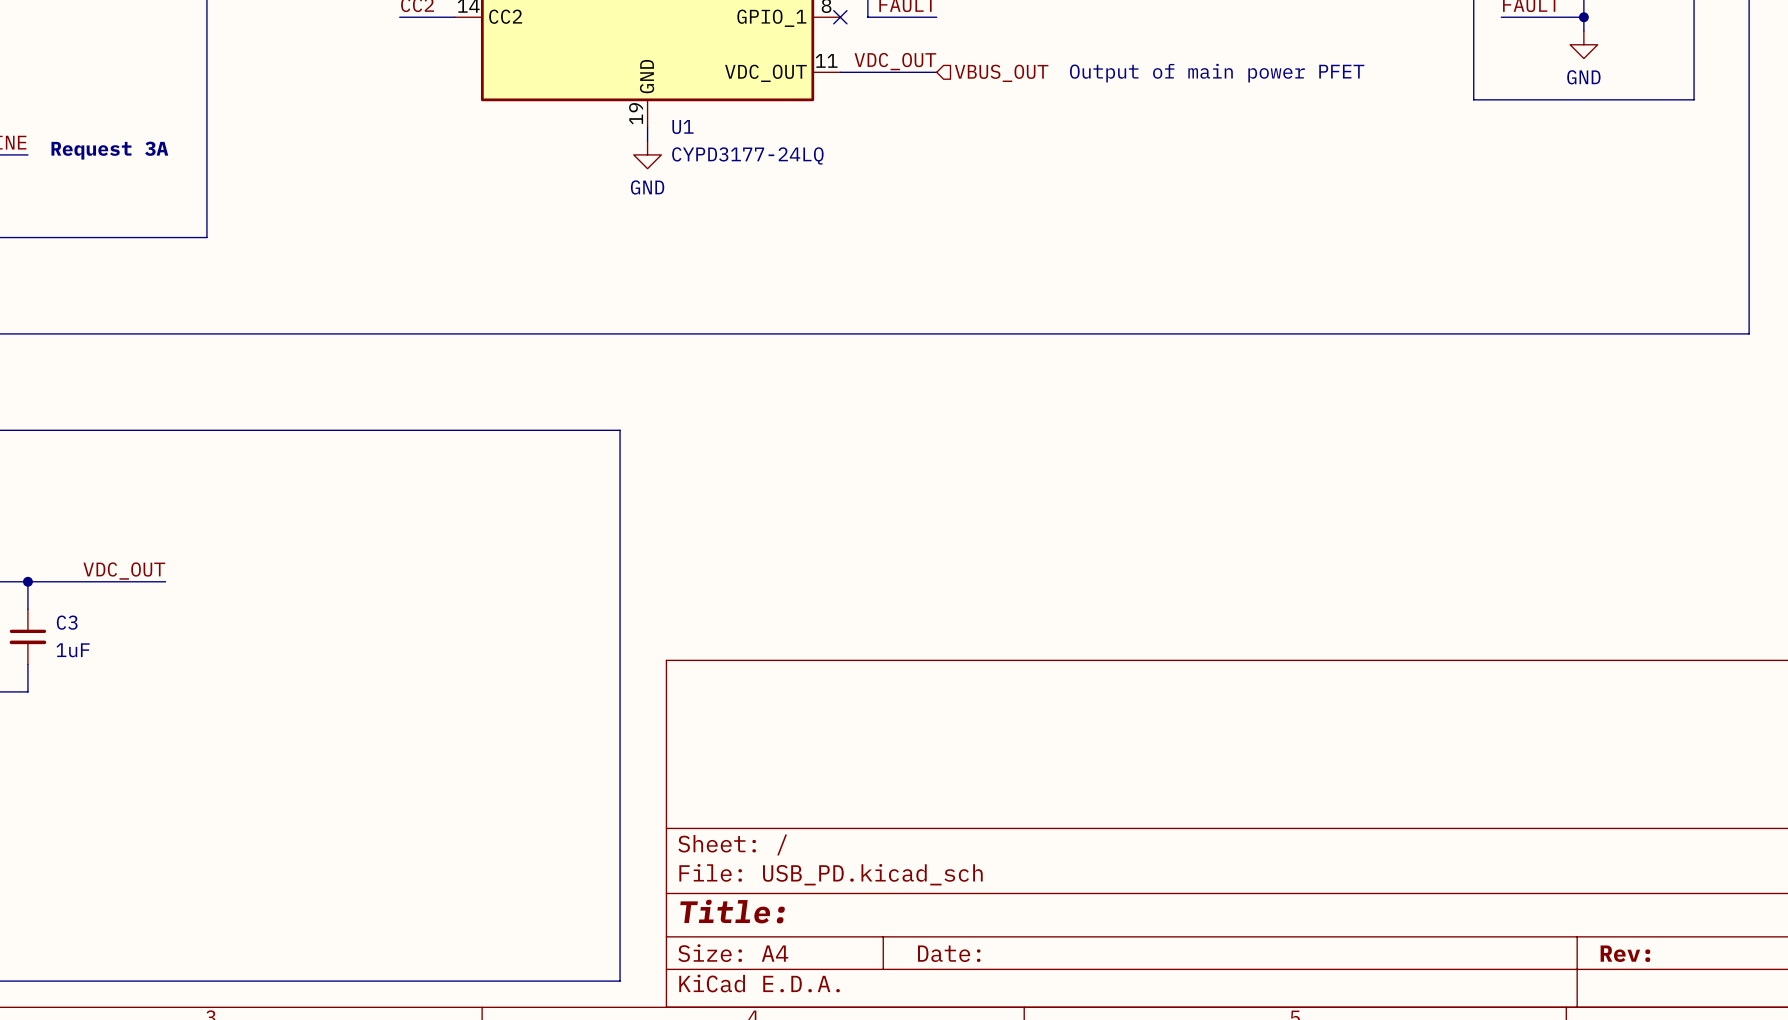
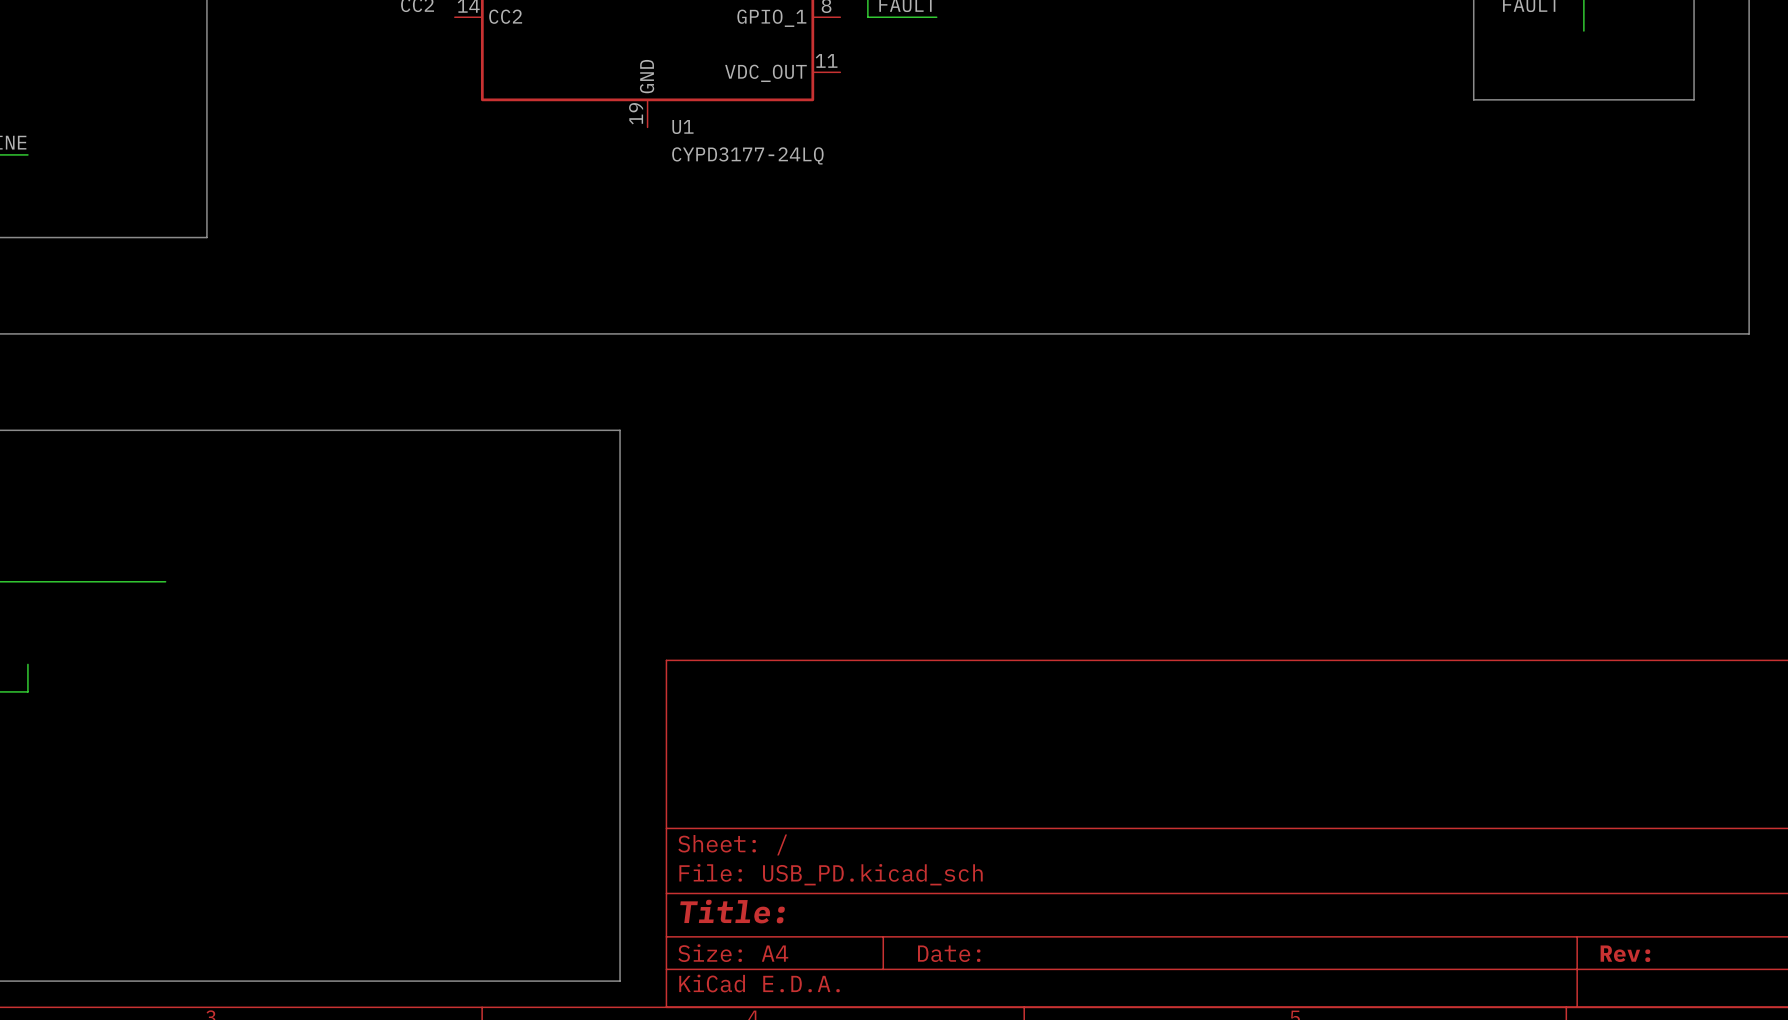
wire: (399, 17) (454, 17) -> none
no-connect mark: (840, 17) -> none
wire: (1501, 17) (1583, 17) -> none
junction: (1583, 17) -> none
power symbol: GND (1583, 44) -> none
label: VDC_OUT (895, 61) -> none
wire: (840, 72) (936, 72) -> none
hierarchical label: VBUS_OUT (1001, 73) -> none
text: Output of main power PFET (1217, 73) -> none
wire: (647, 127) (647, 141) -> none
text: Request 3A (109, 150) -> none
power symbol: GND (647, 154) -> none
label: VDC_OUT (124, 571) -> none
wire: (27, 581) (27, 609) -> none
junction: (27, 581) -> none
C3: 1uF (27, 636) -> none

